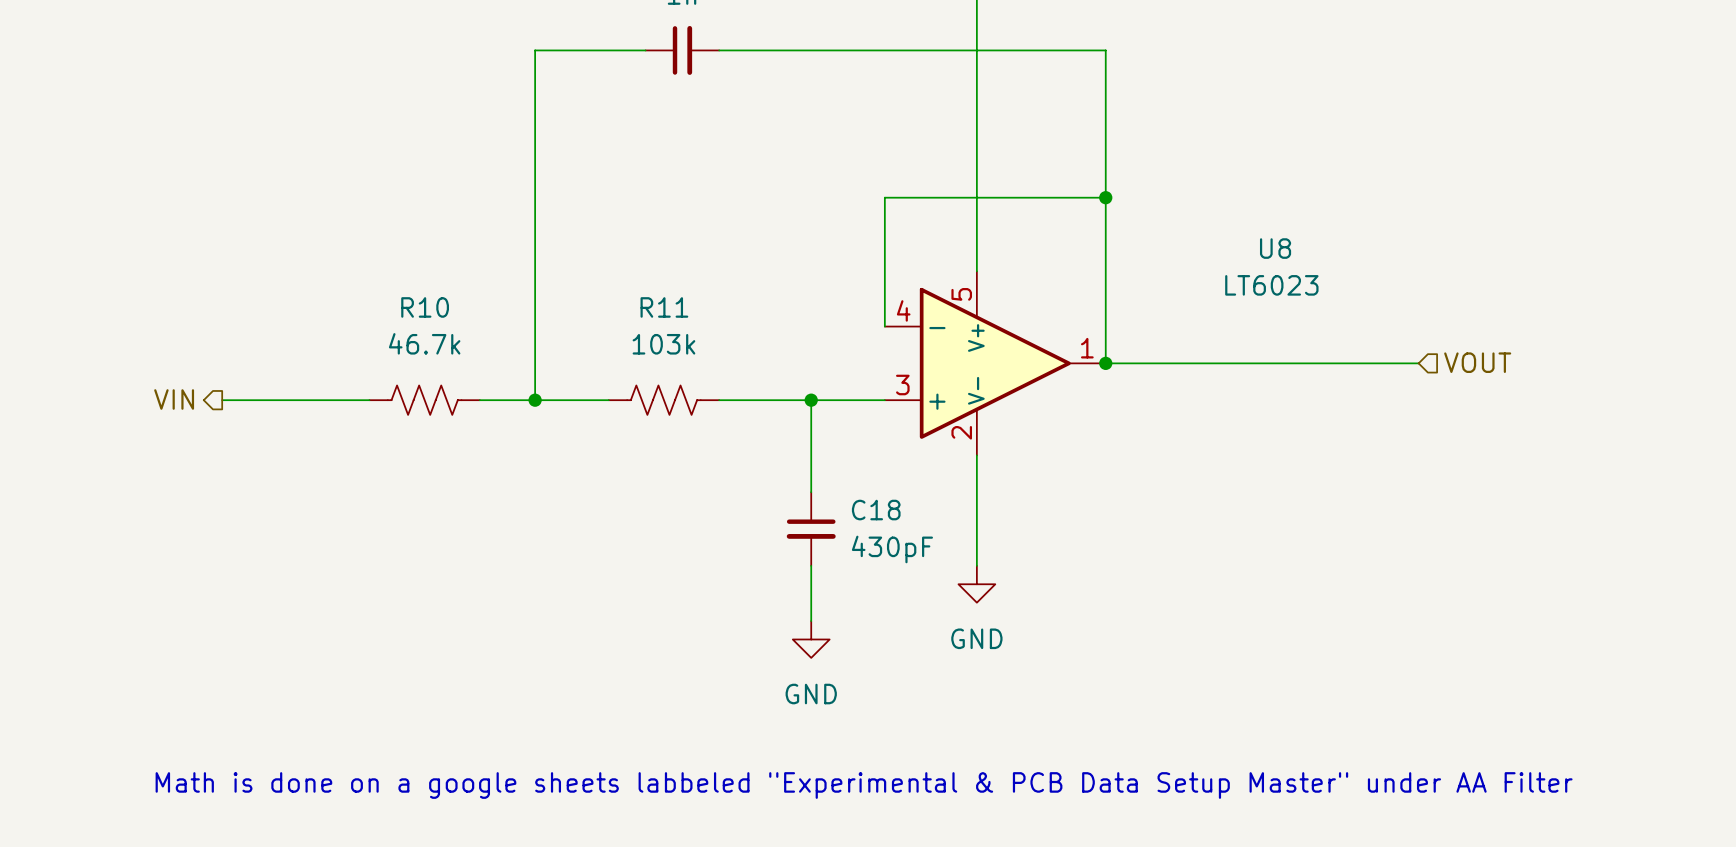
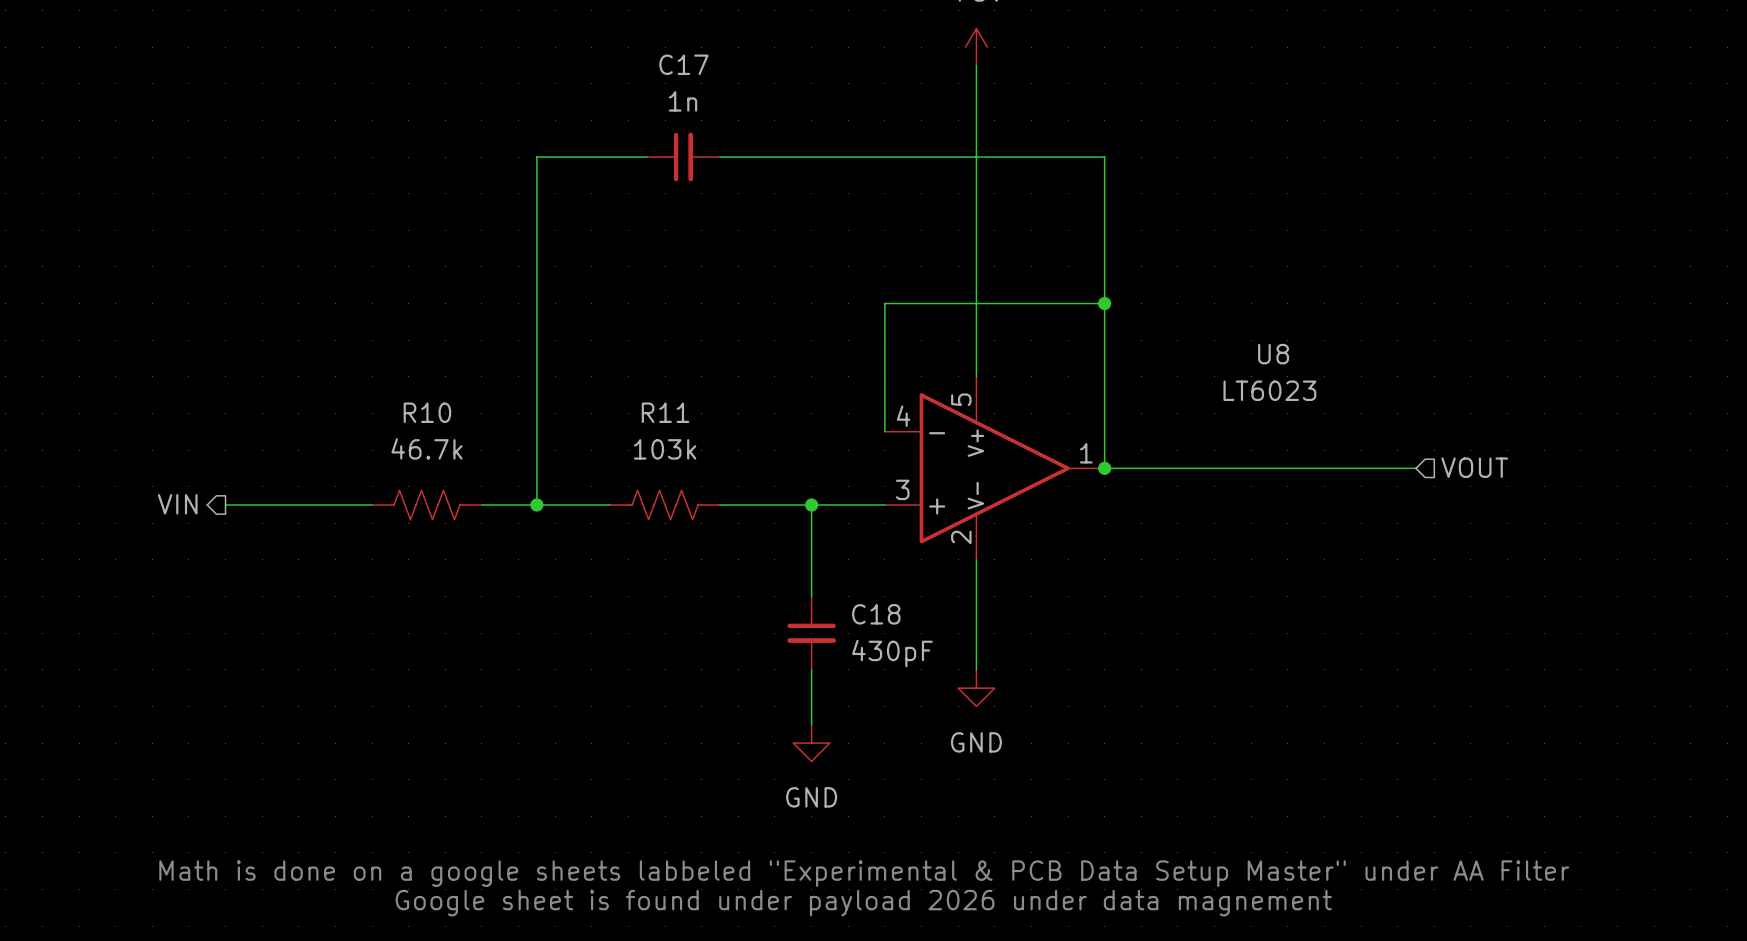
text position: Math is done on a google sheets labbeled "Experimental & PCB Data Setup Master" under AA Filter (864, 785) -> Math is done on a google sheets labbeled "Experimental & PCB Data Setup Master" under AA Filter (864, 873)
text: none -> Google sheet is found under payload 2026 under data magnement (863, 903)

